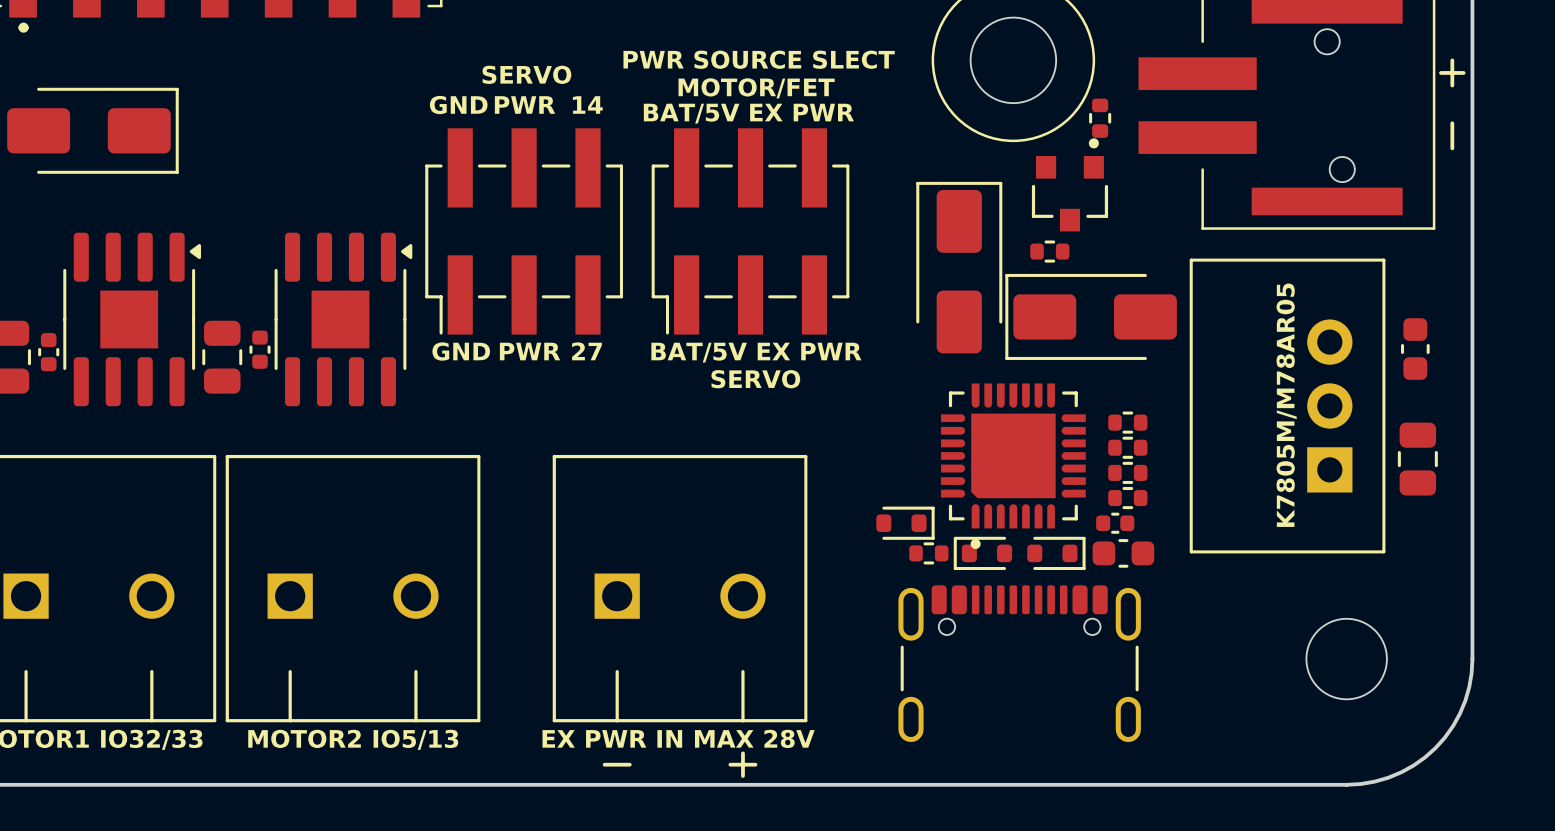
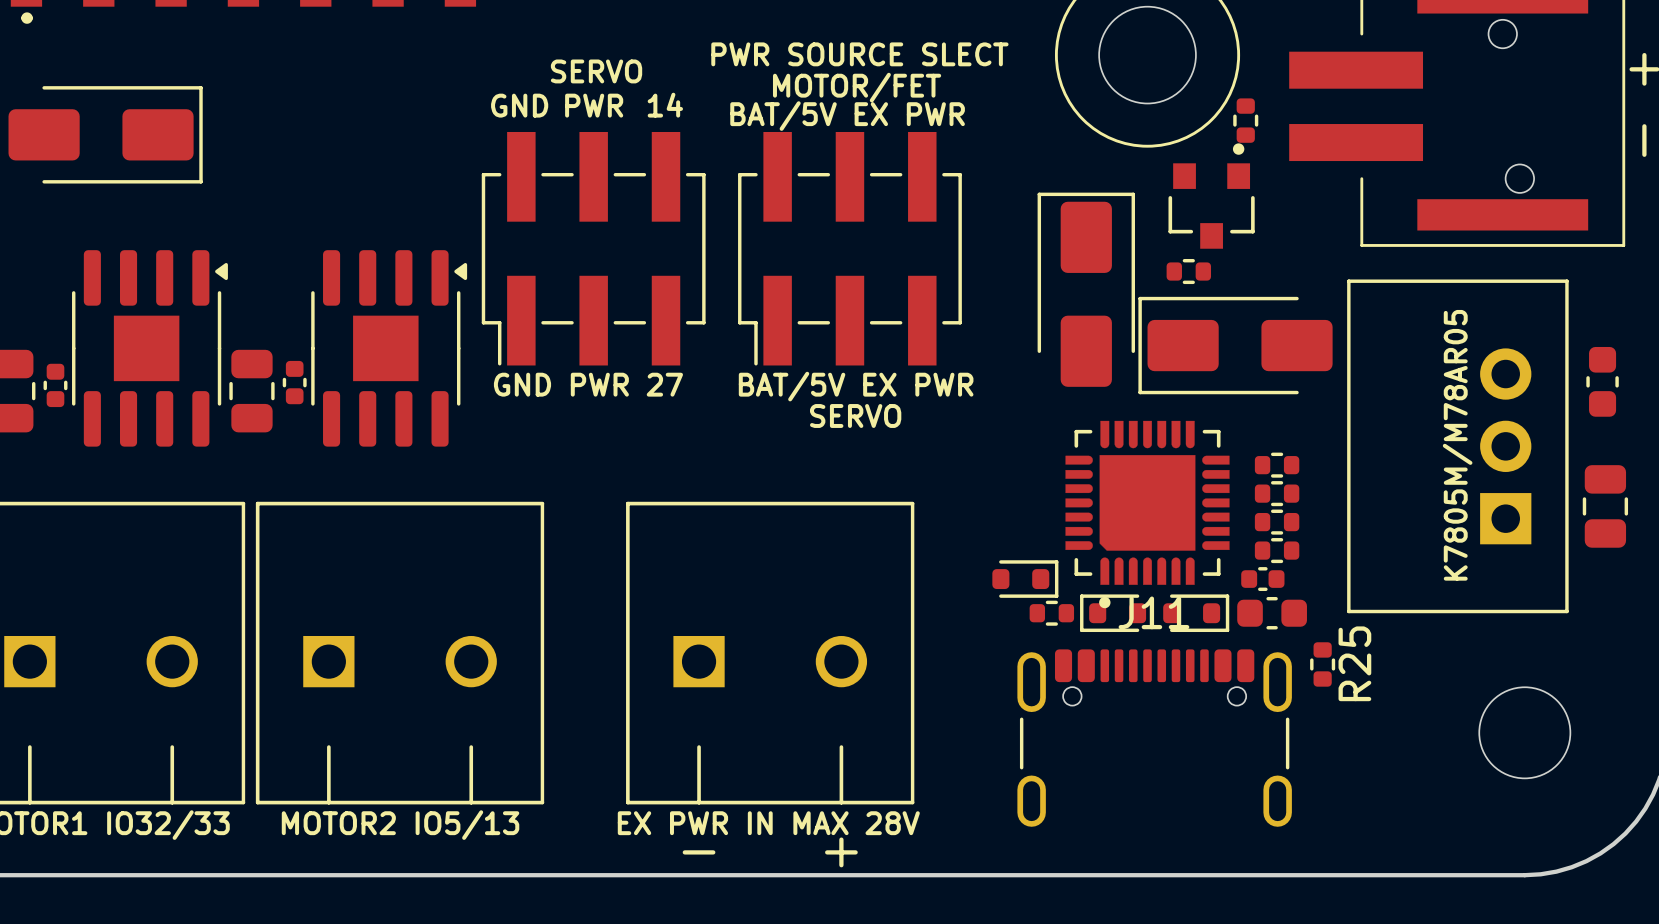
J11 name: none -> J11 (1153, 612)
R25: none -> (1322, 664)

